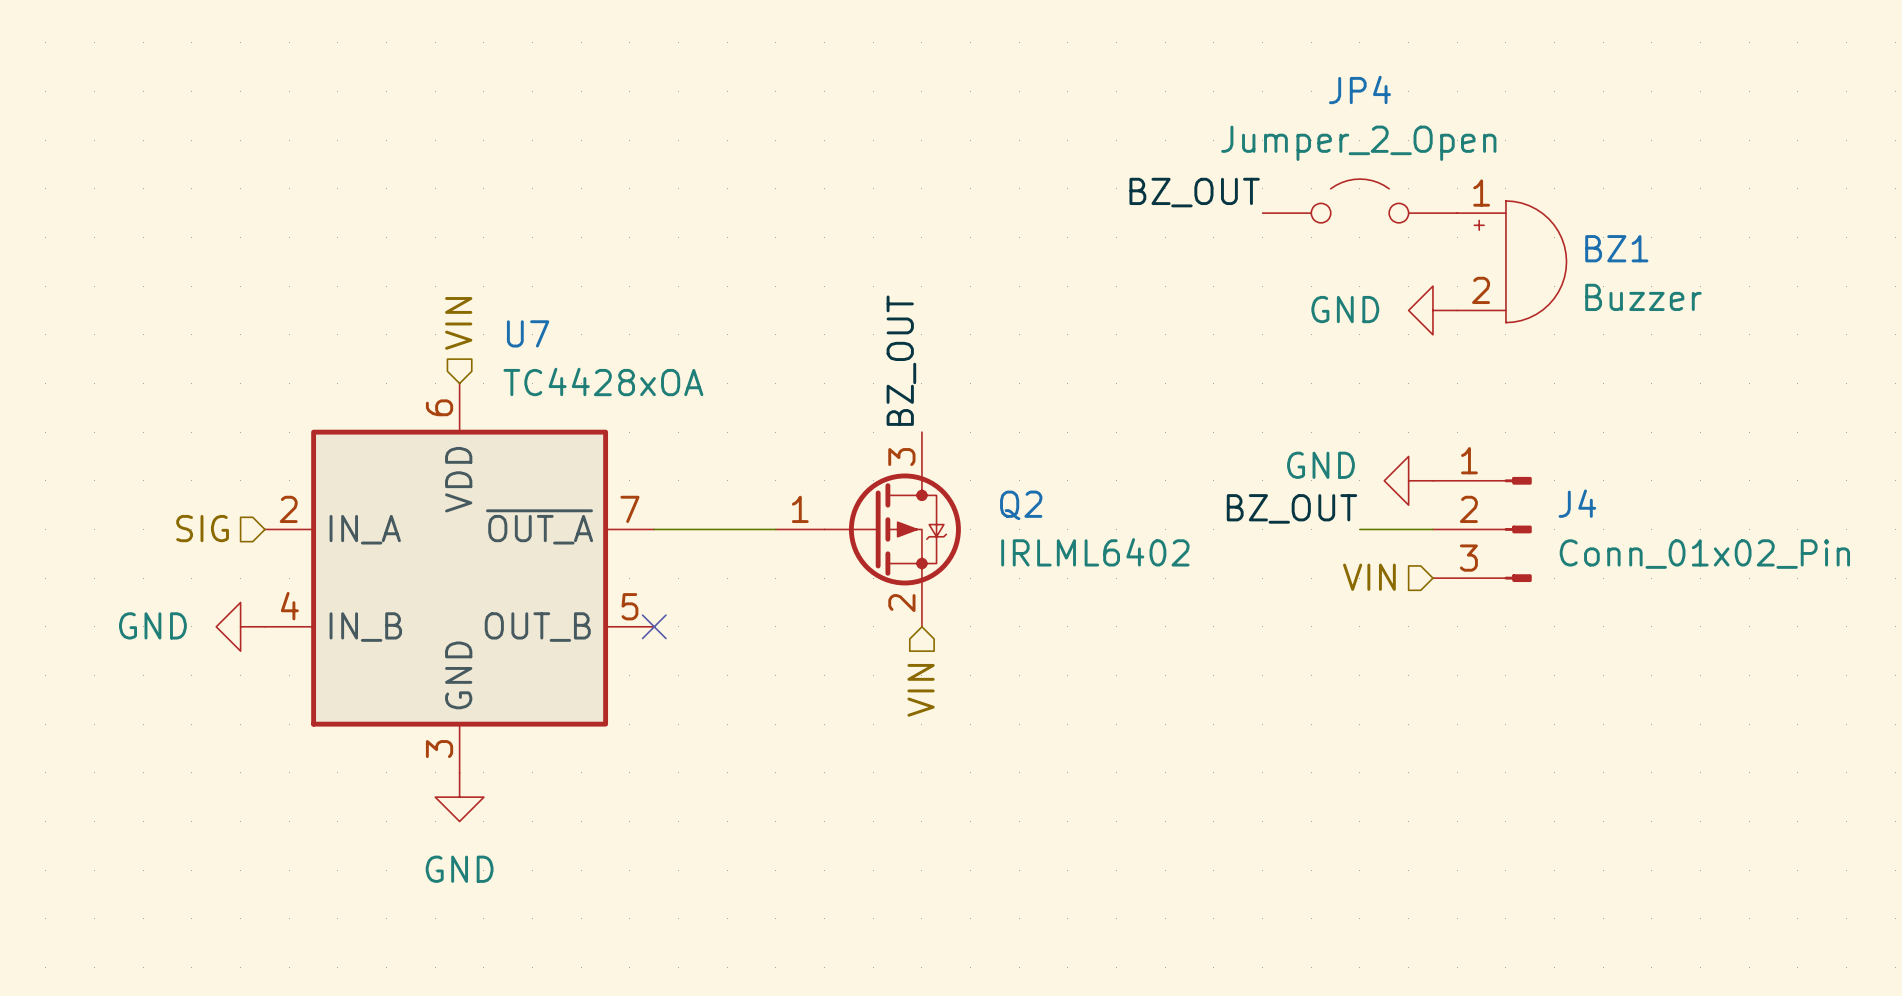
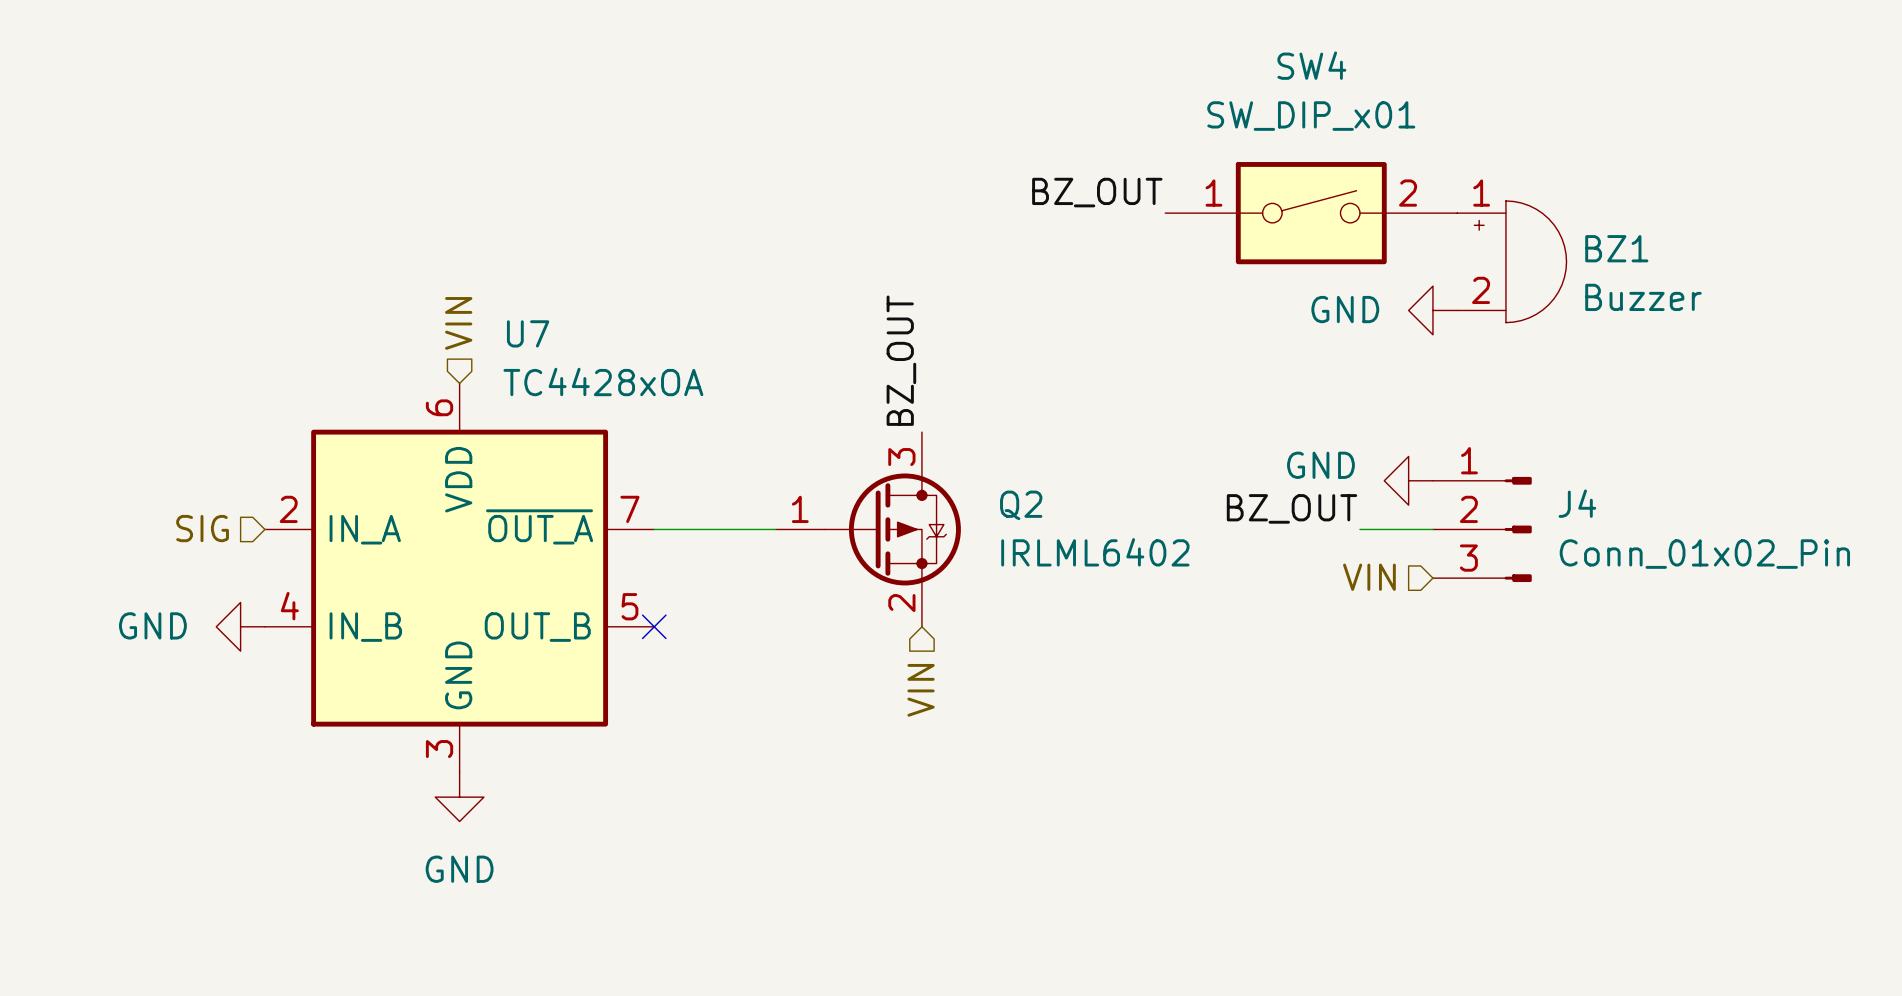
label position: BZ_OUT (1194, 192) -> BZ_OUT (1097, 192)
JP4: Jumper_2_Open (1359, 200) -> none
SW4: none -> SW_DIP_x01 (1311, 213)

